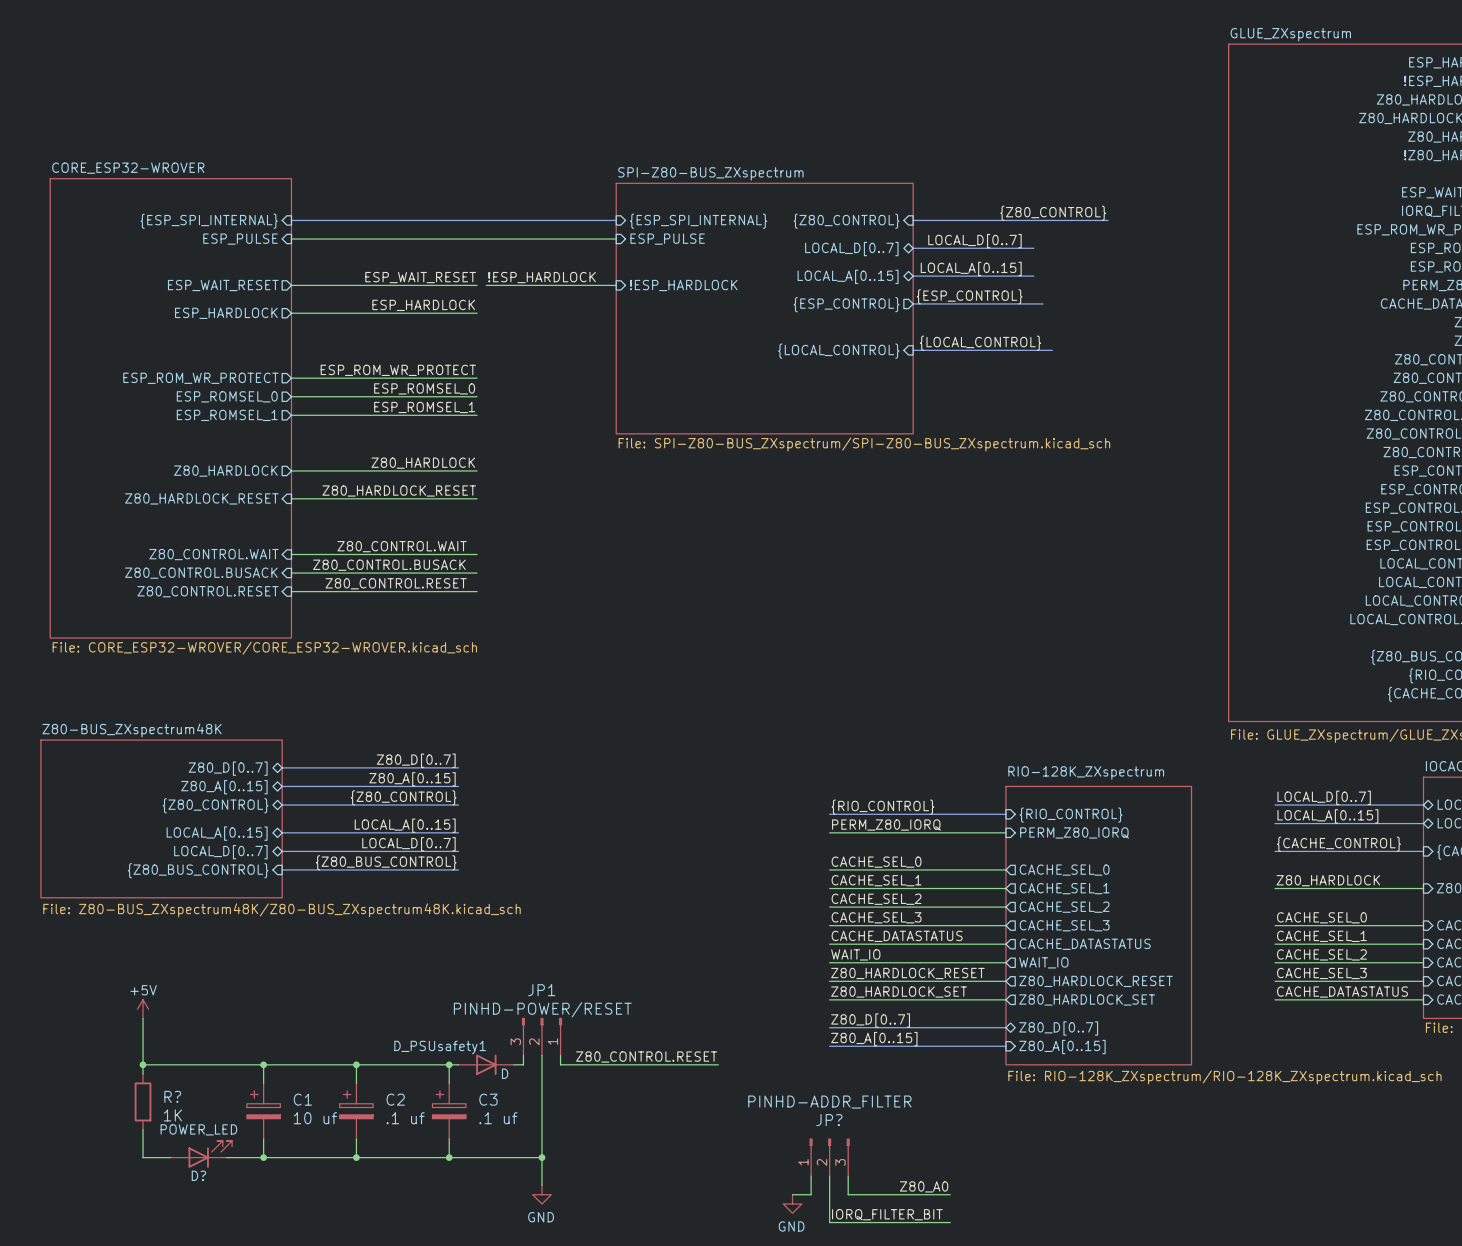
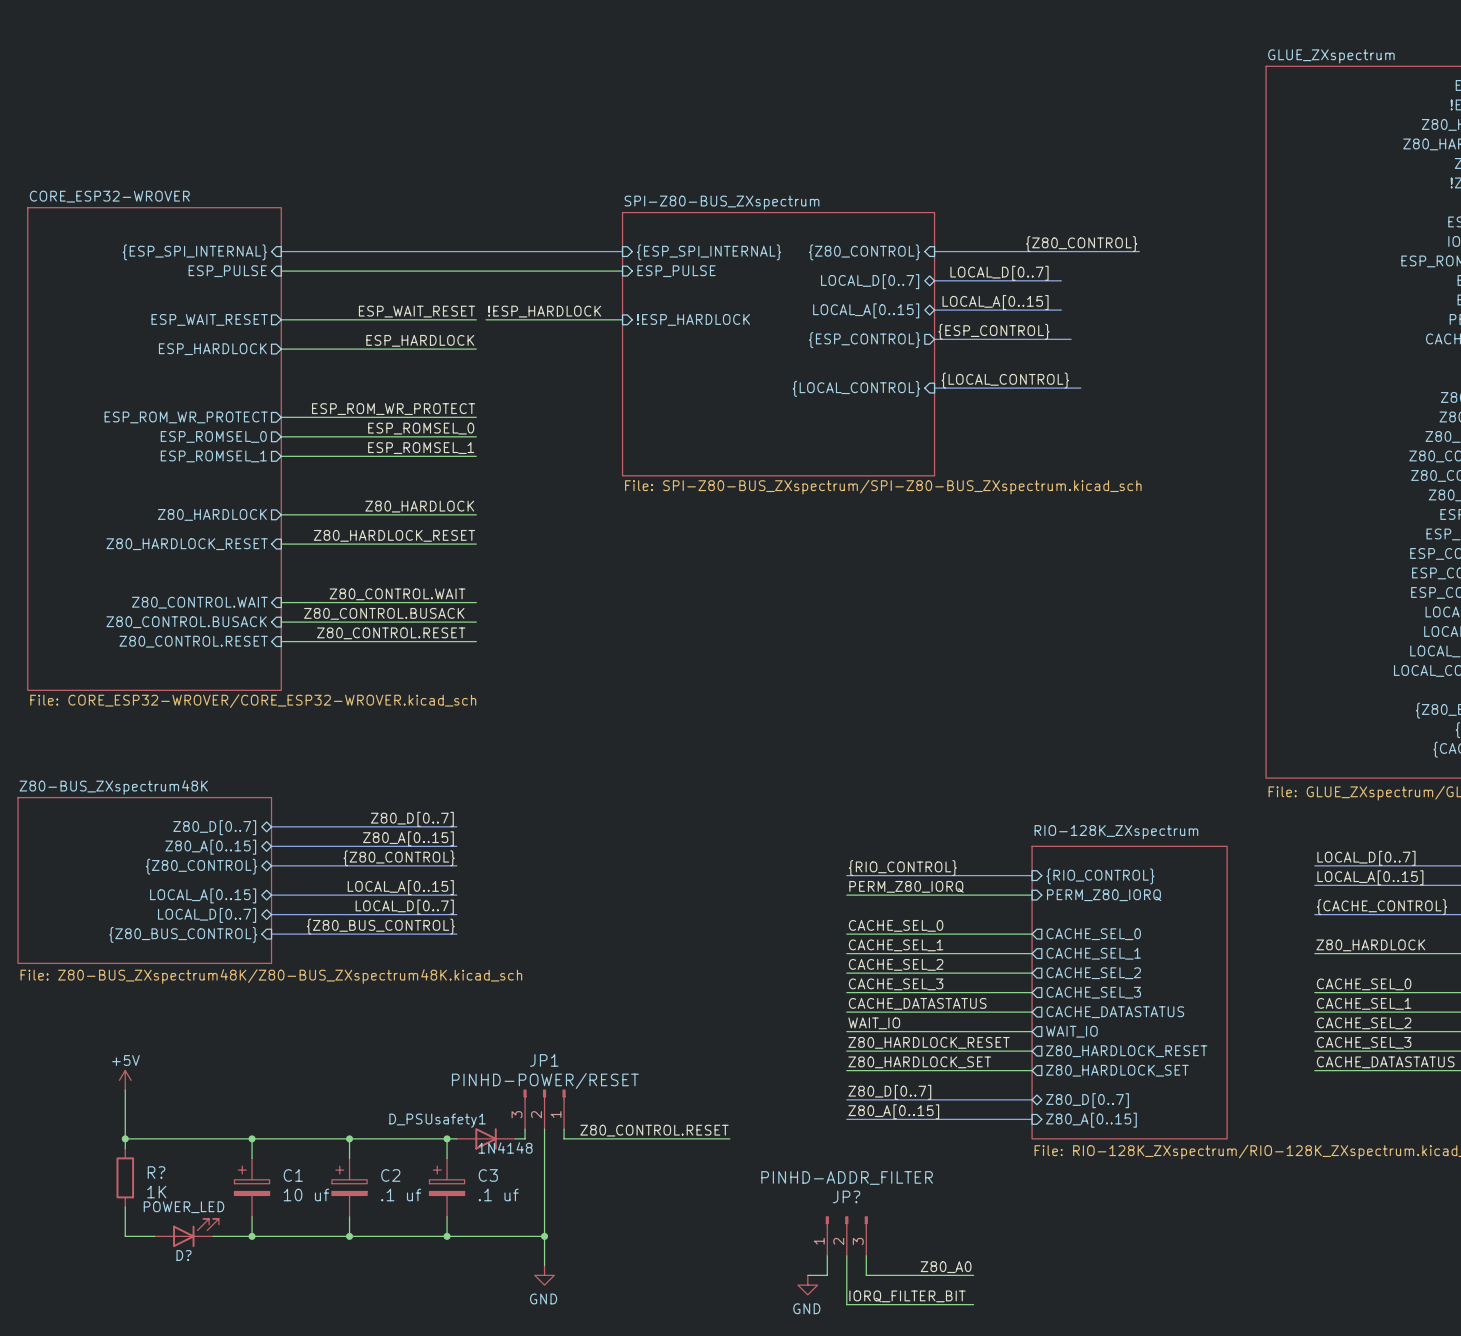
D_PSUsafety1 value: D (505, 1073) -> 1N4148 (505, 1148)

